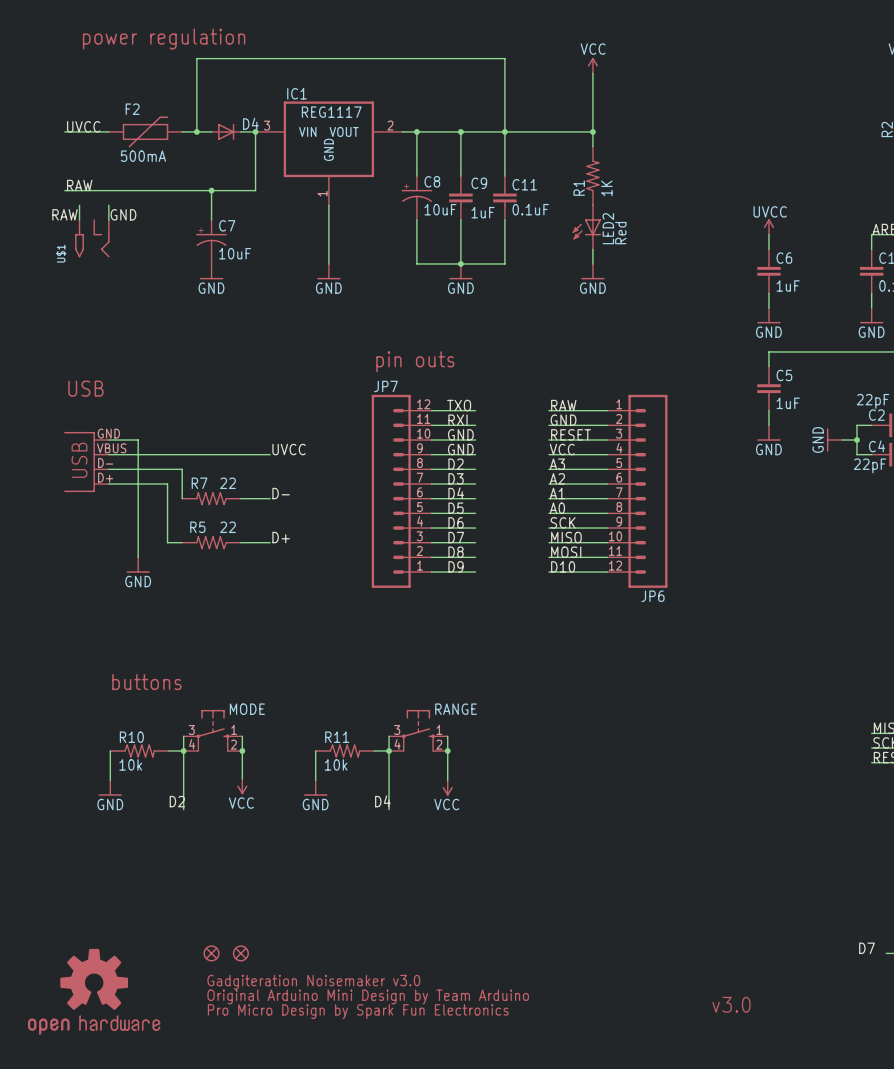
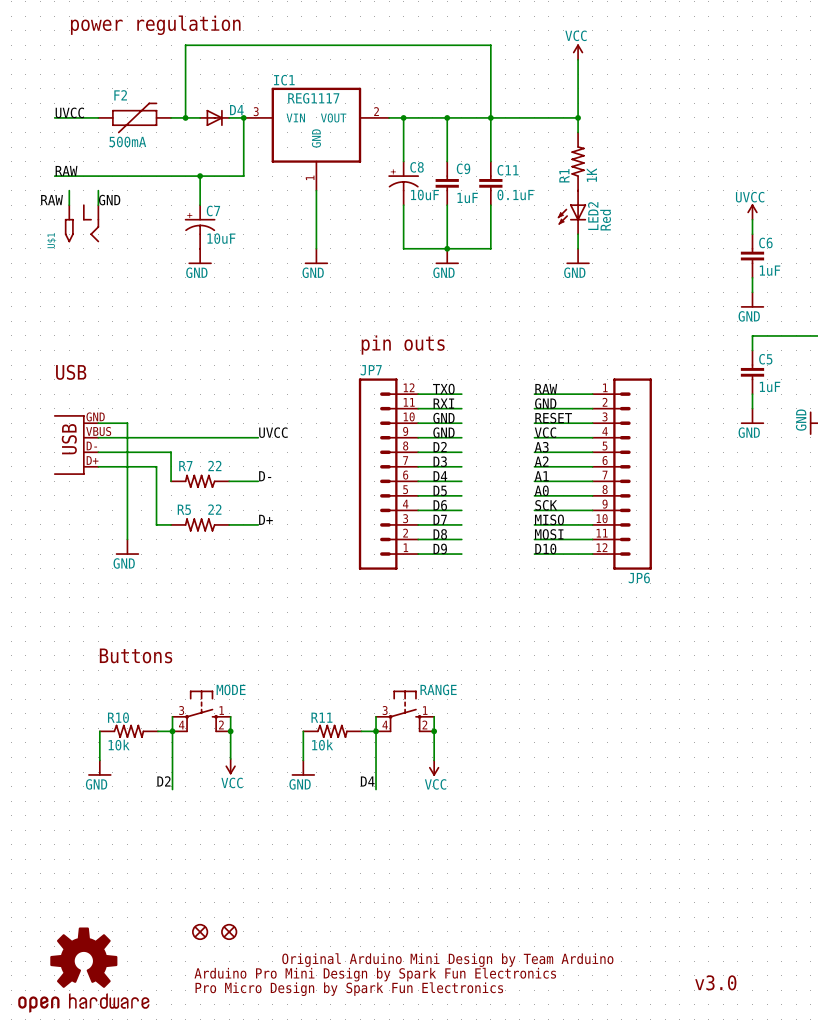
text: buttons (146, 682) -> Buttons (136, 655)
text: Gadgiteration Noisemaker v3.0 (313, 982) -> none
text: none -> Original Arduino Mini Design by Team Arduino (447, 960)
text: Original Arduino Mini Design by Team Arduino (368, 996) -> Arduino Pro Mini Design by Spark Fun Electronics (375, 974)

